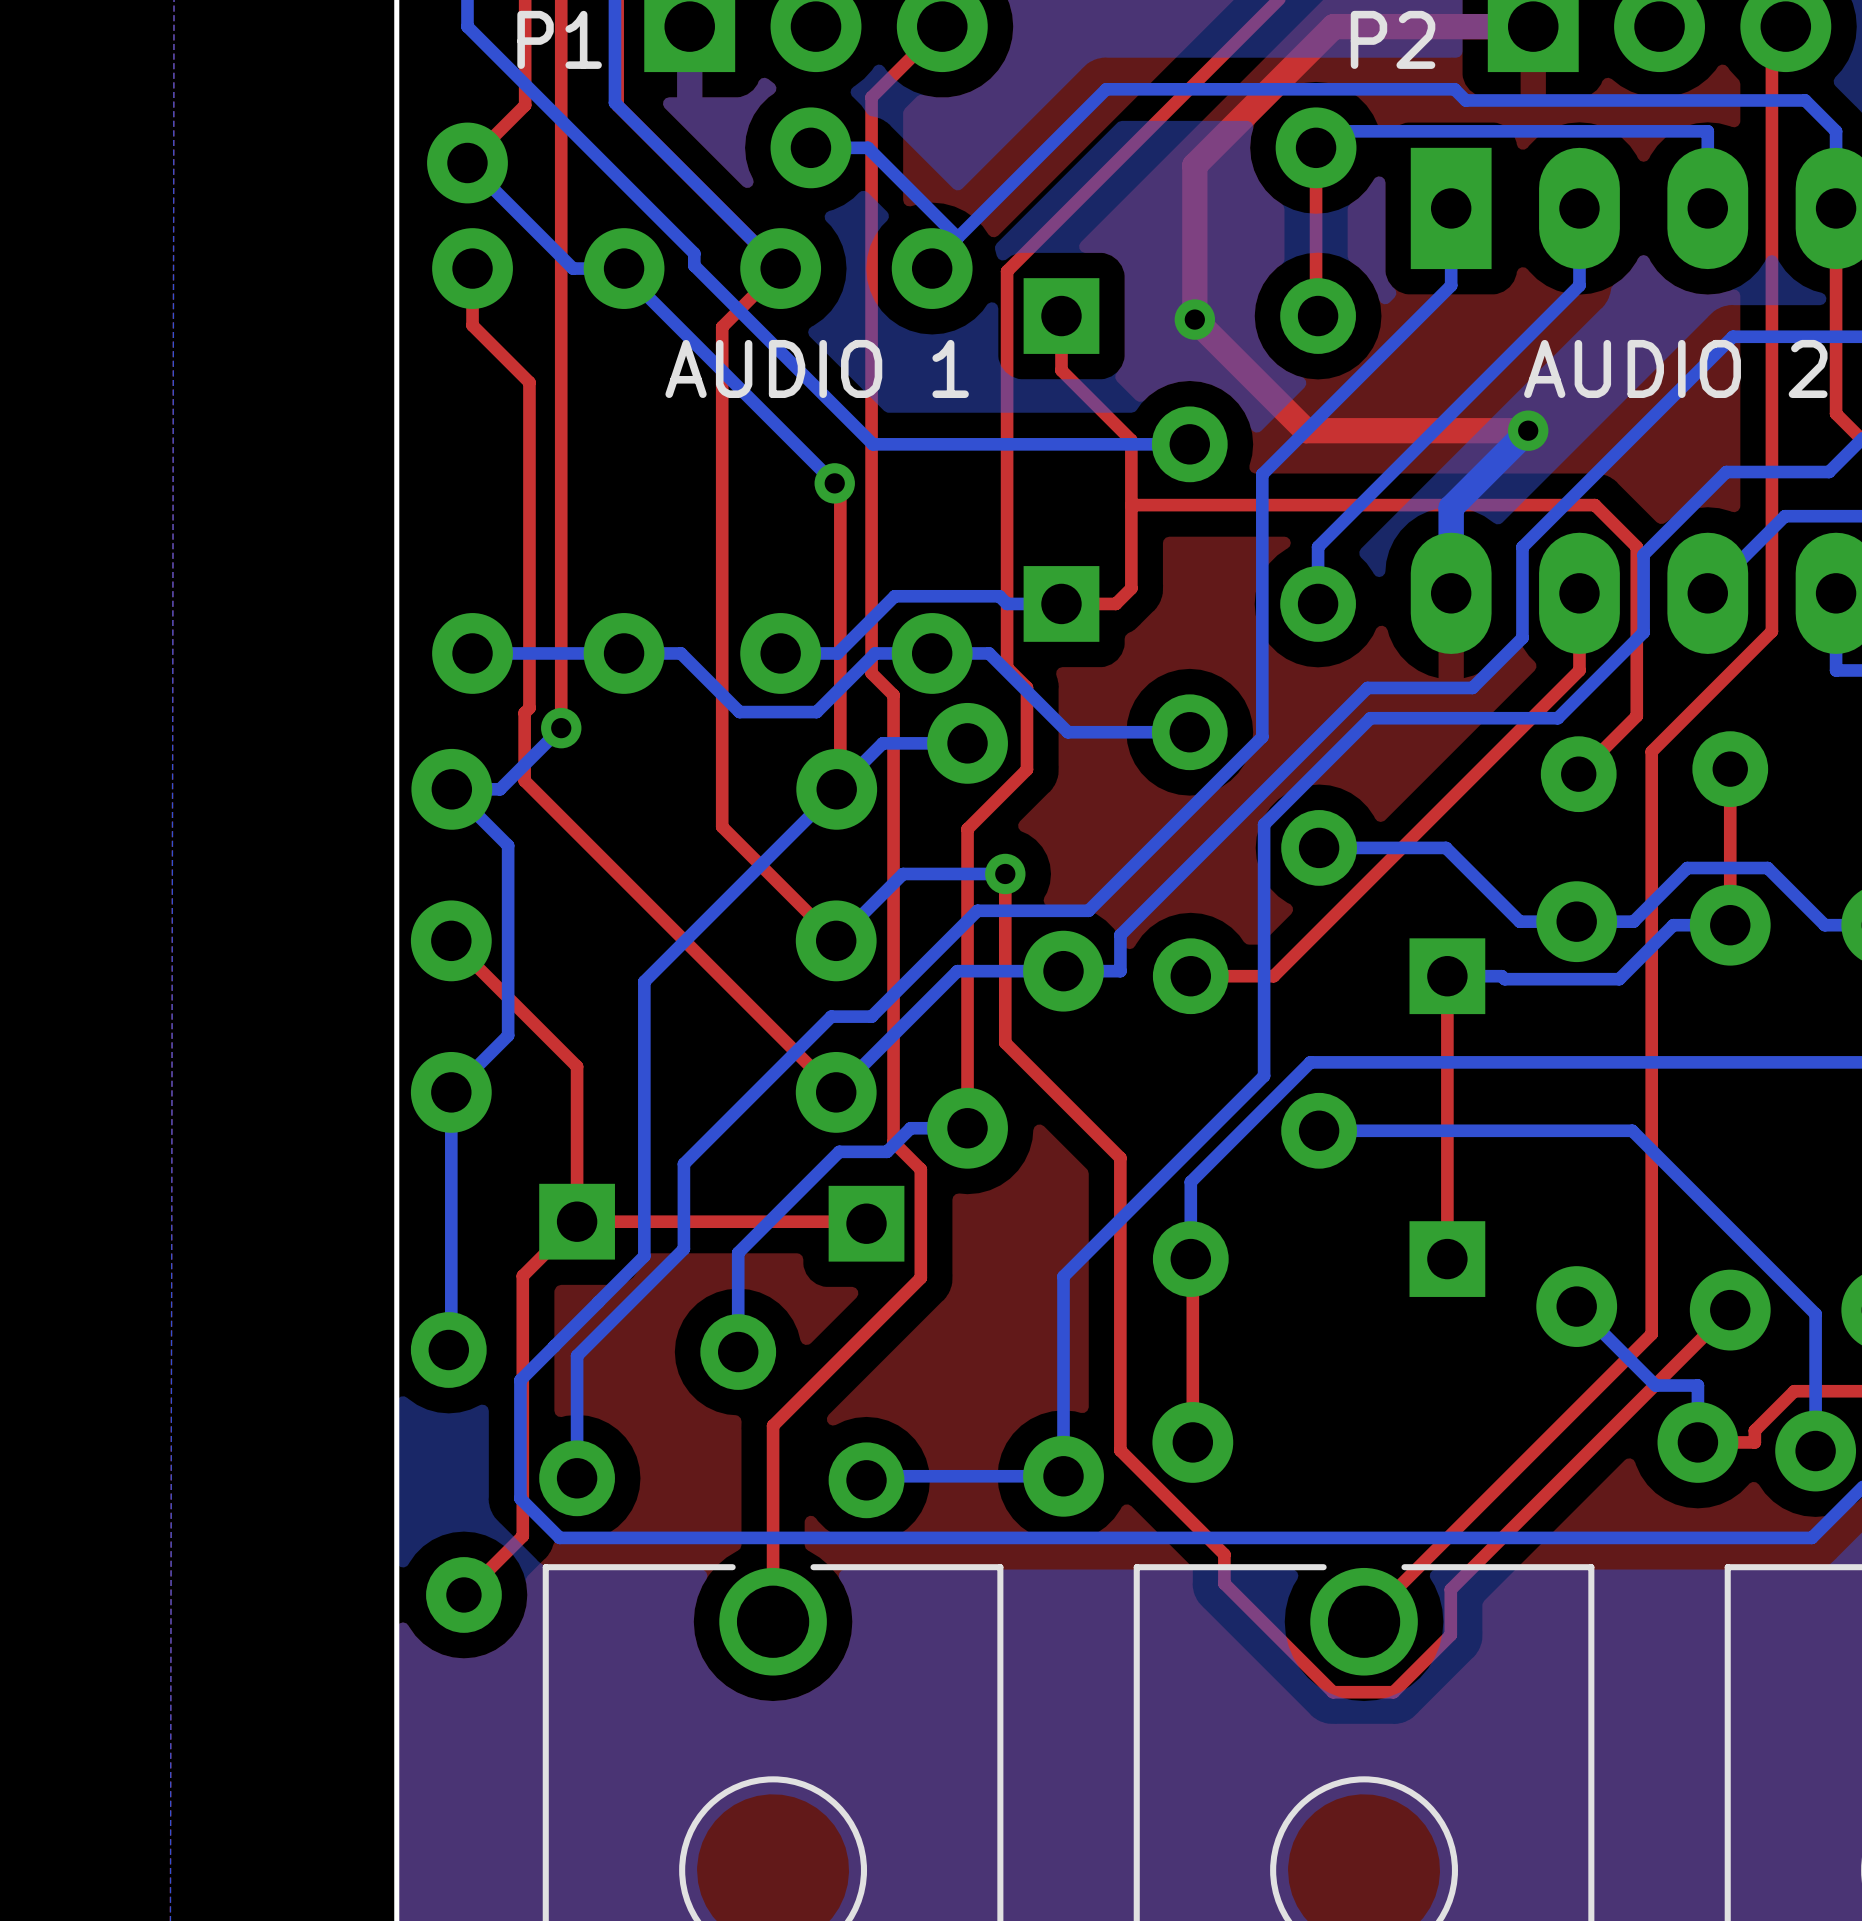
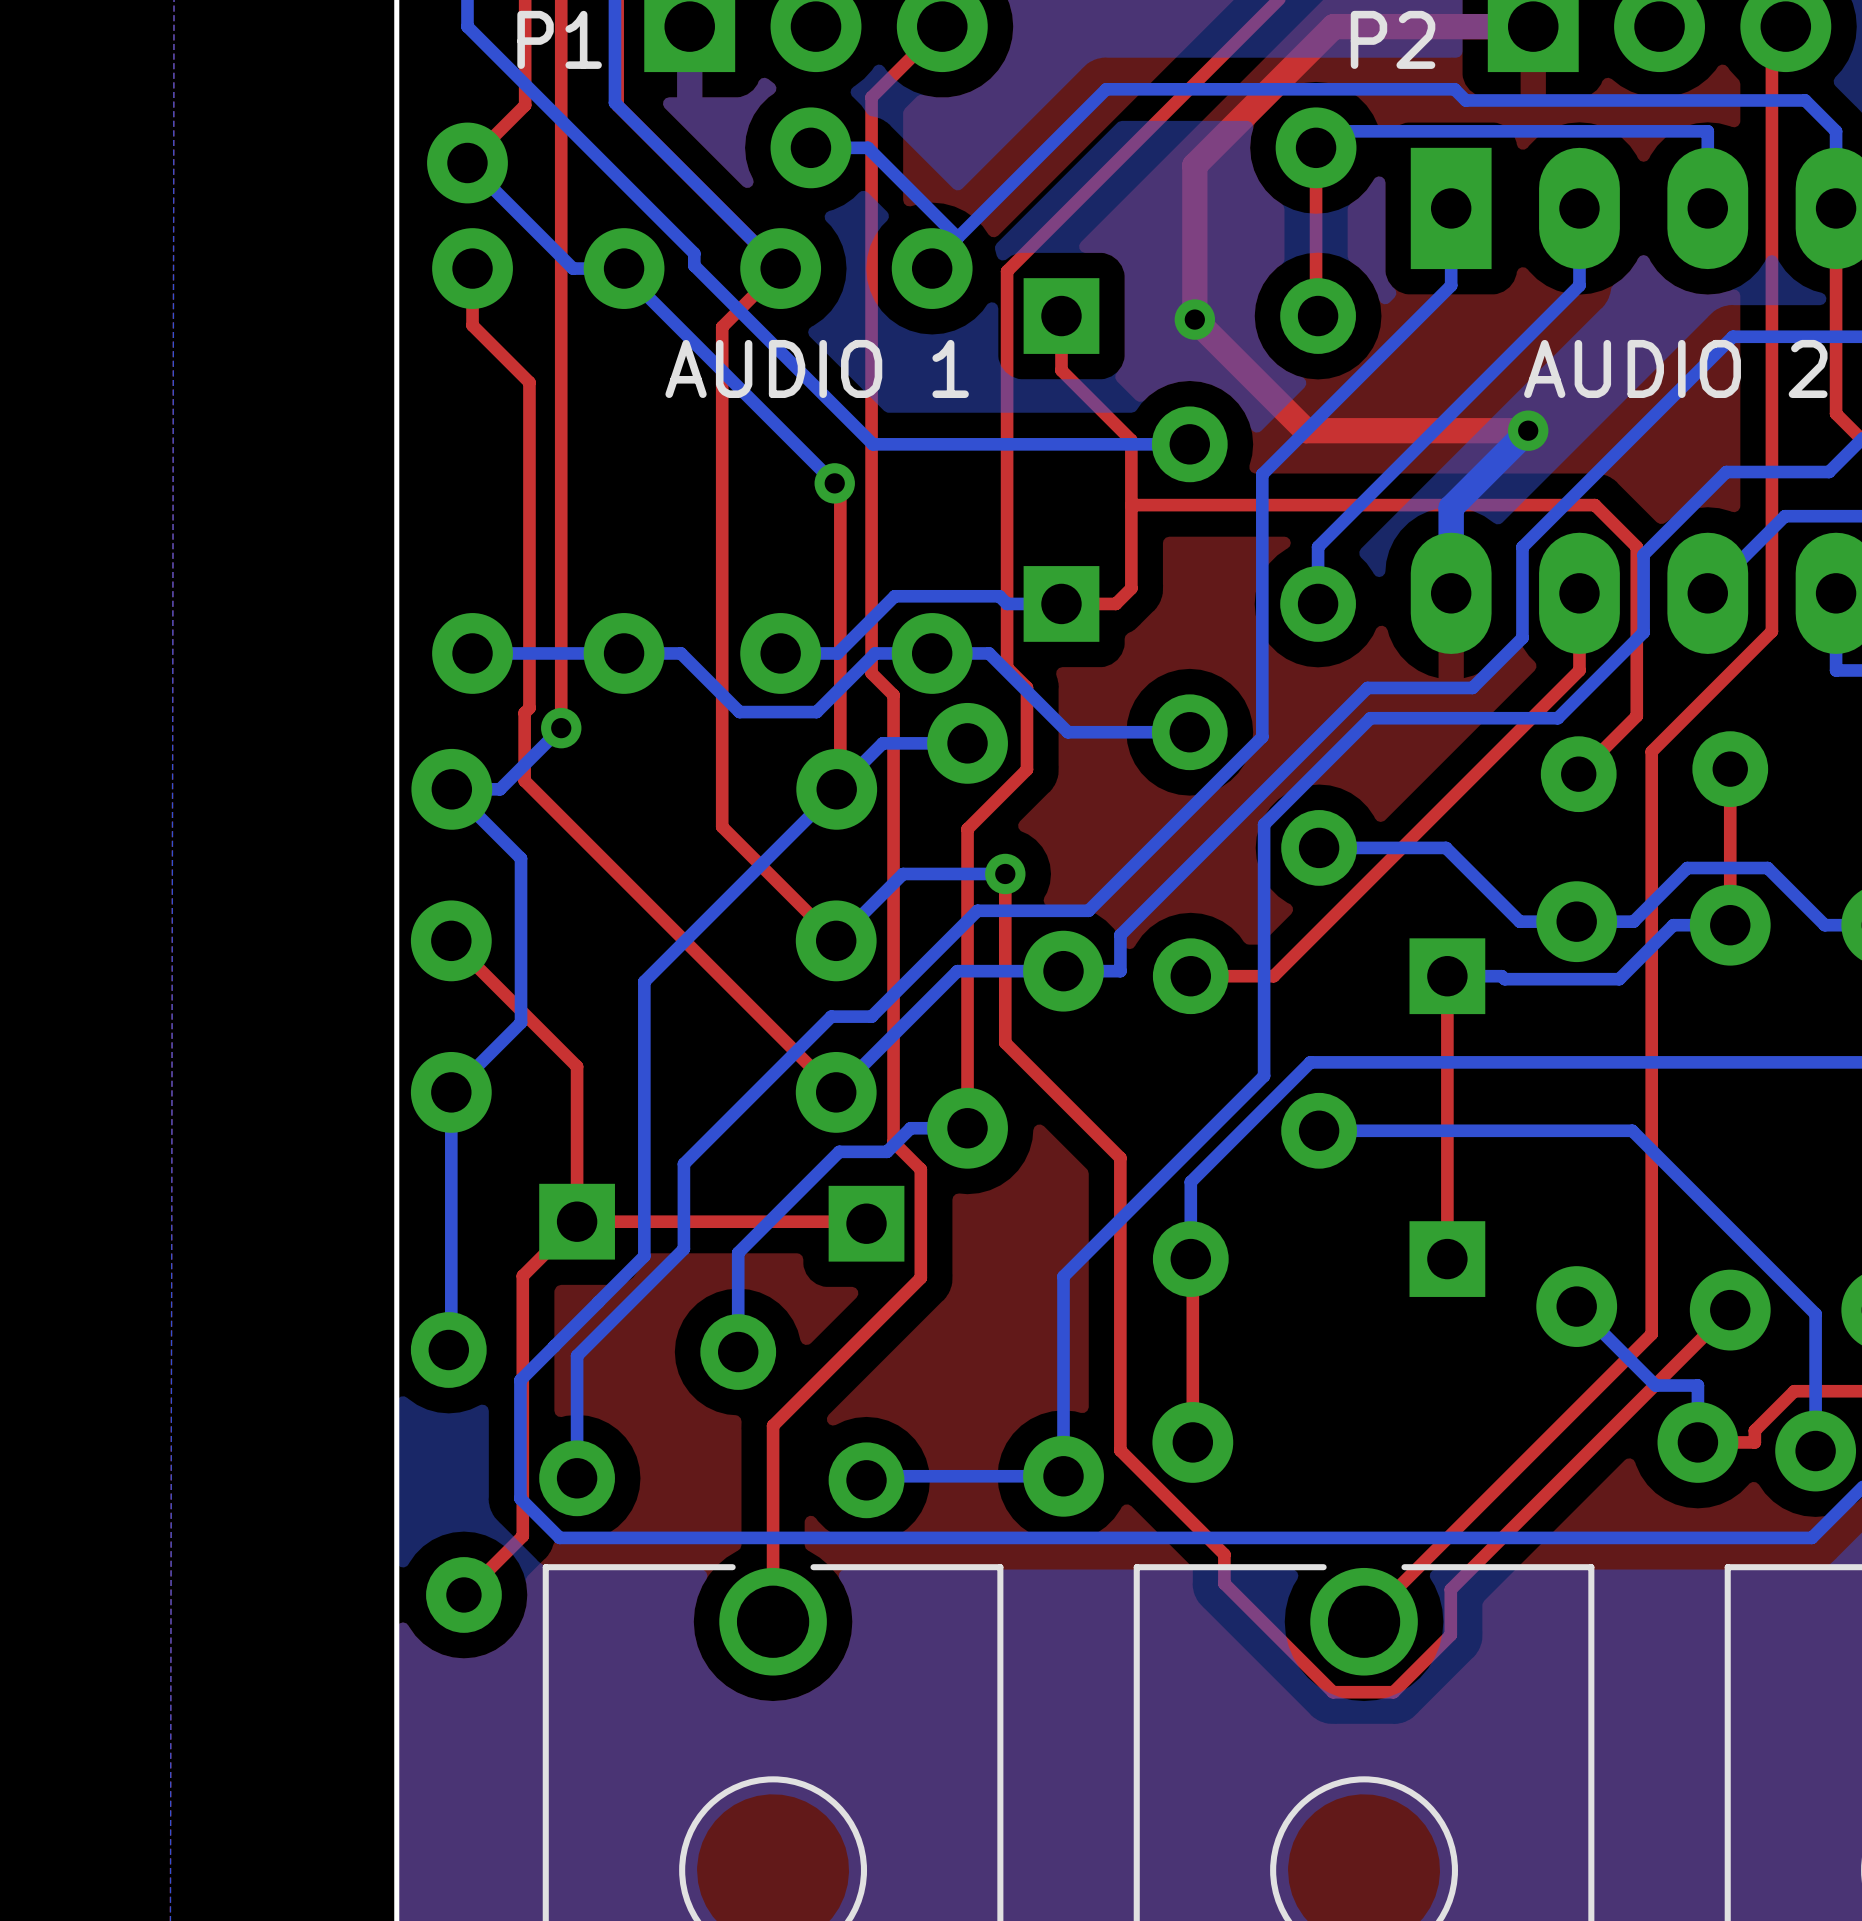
bottom track: (508, 845) (508, 1035) -> (508, 845) (521, 858) (521, 1022) (508, 1035)

